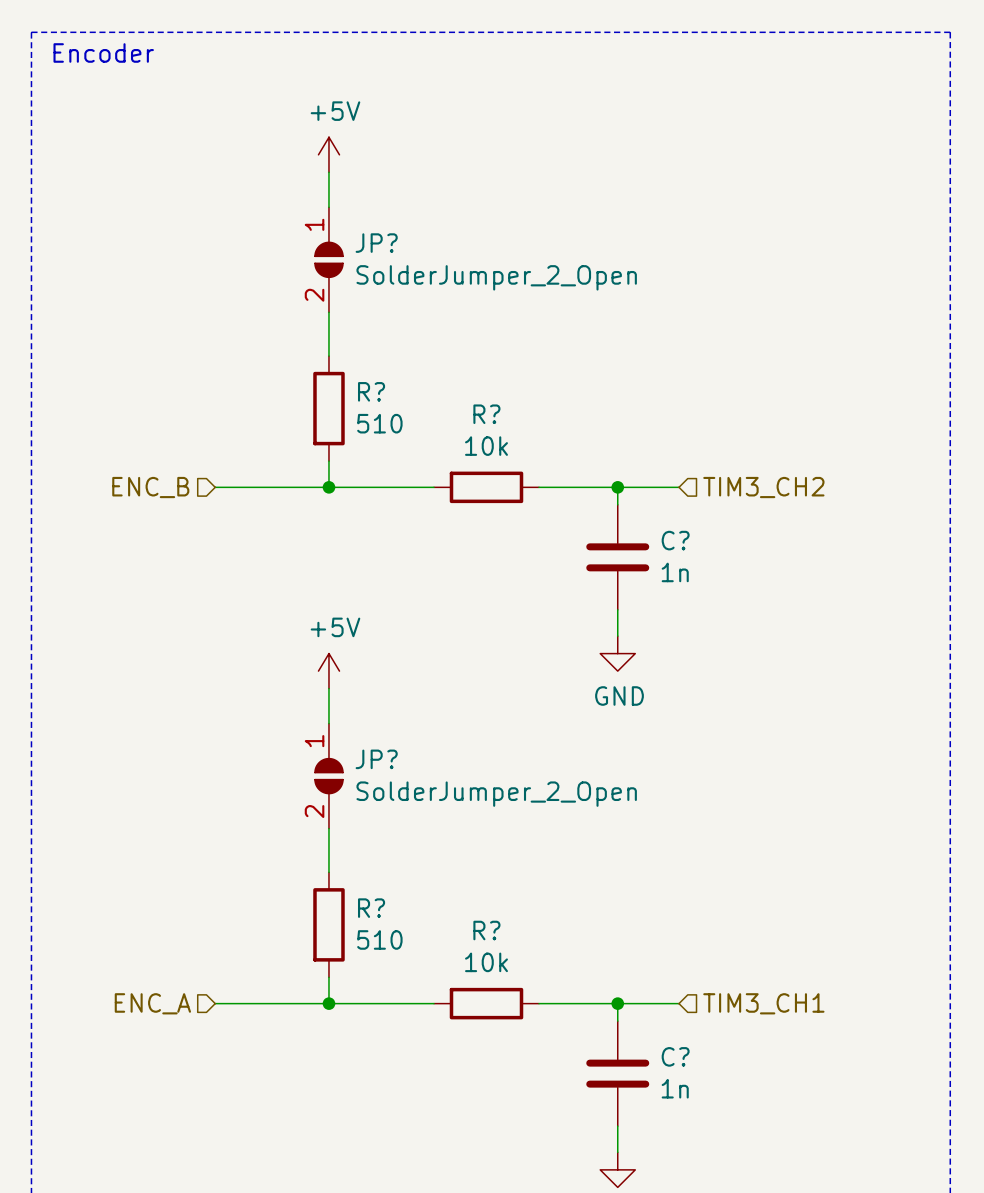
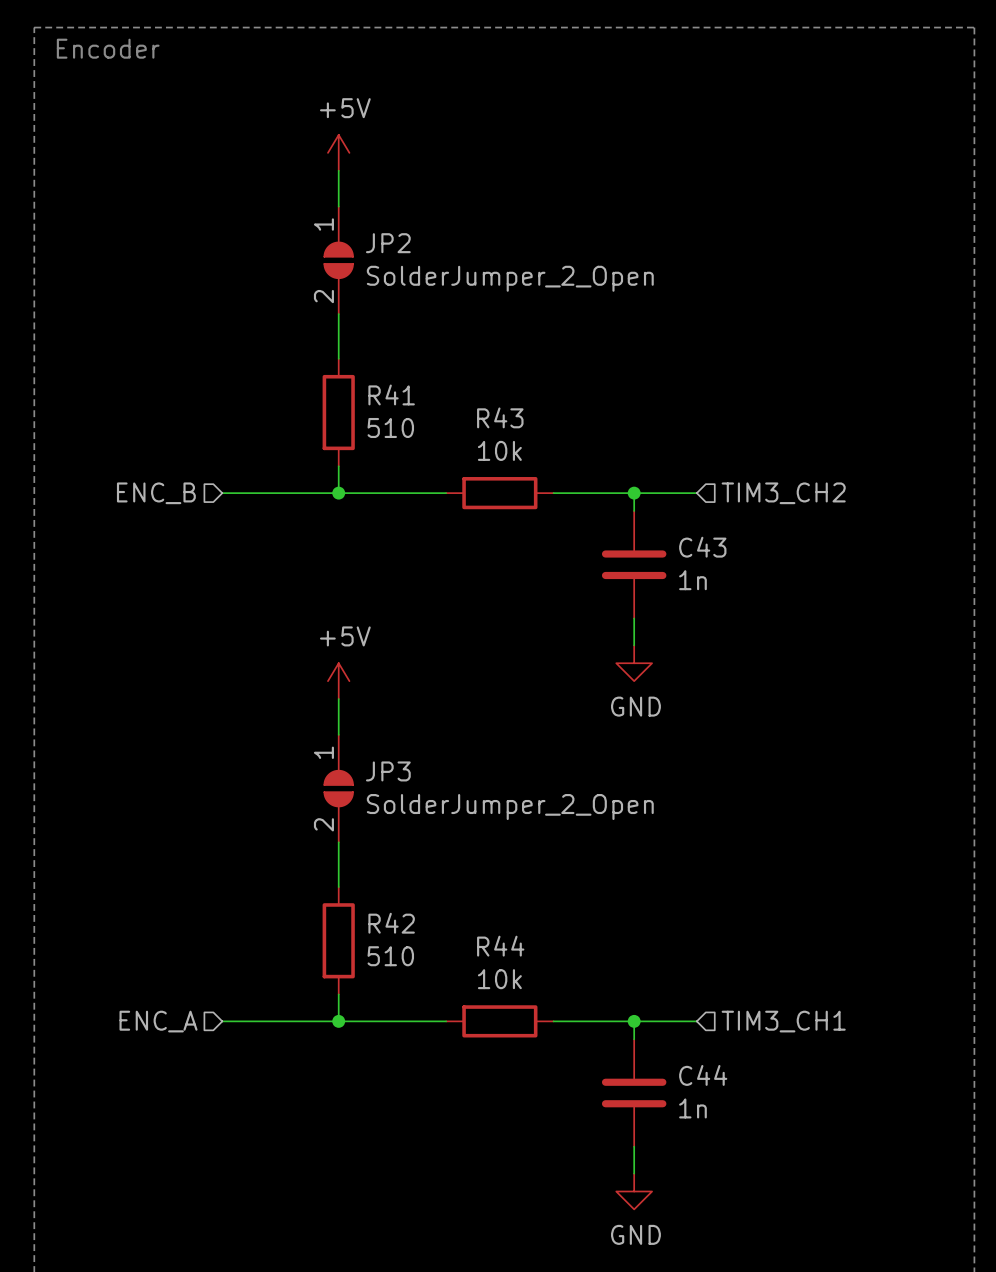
JP? name: JP? (376, 243) -> JP2 (388, 243)
R? name: R? (371, 391) -> R41 (391, 394)
R? name: R? (486, 414) -> R43 (500, 417)
C? name: C? (675, 540) -> C43 (702, 547)
JP? name: JP? (376, 759) -> JP3 (388, 771)
R? name: R? (371, 908) -> R42 (391, 923)
R? name: R? (486, 930) -> R44 (500, 946)
C? name: C? (675, 1056) -> C44 (703, 1075)

